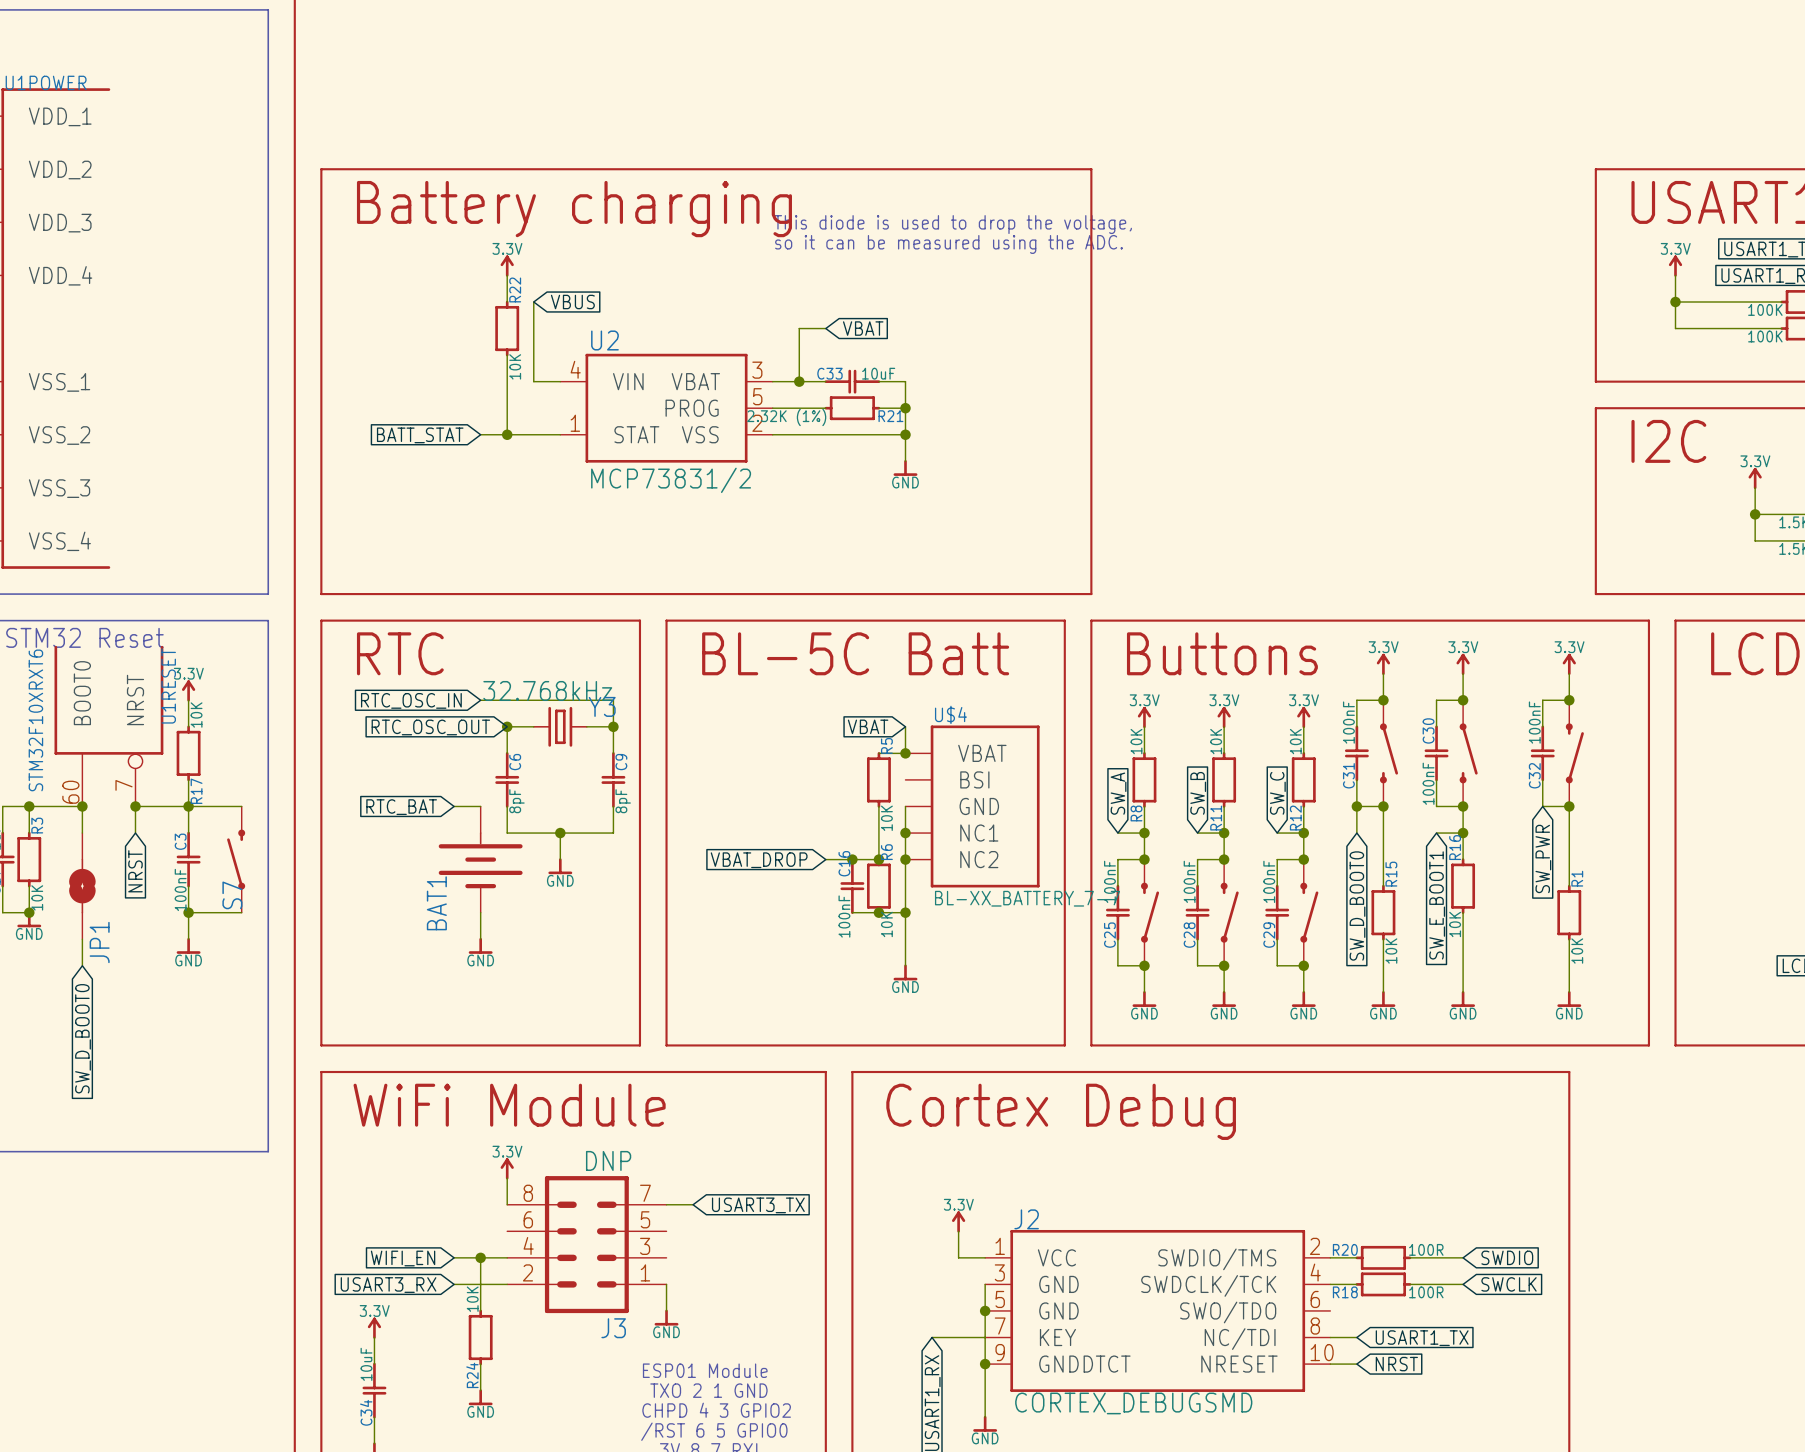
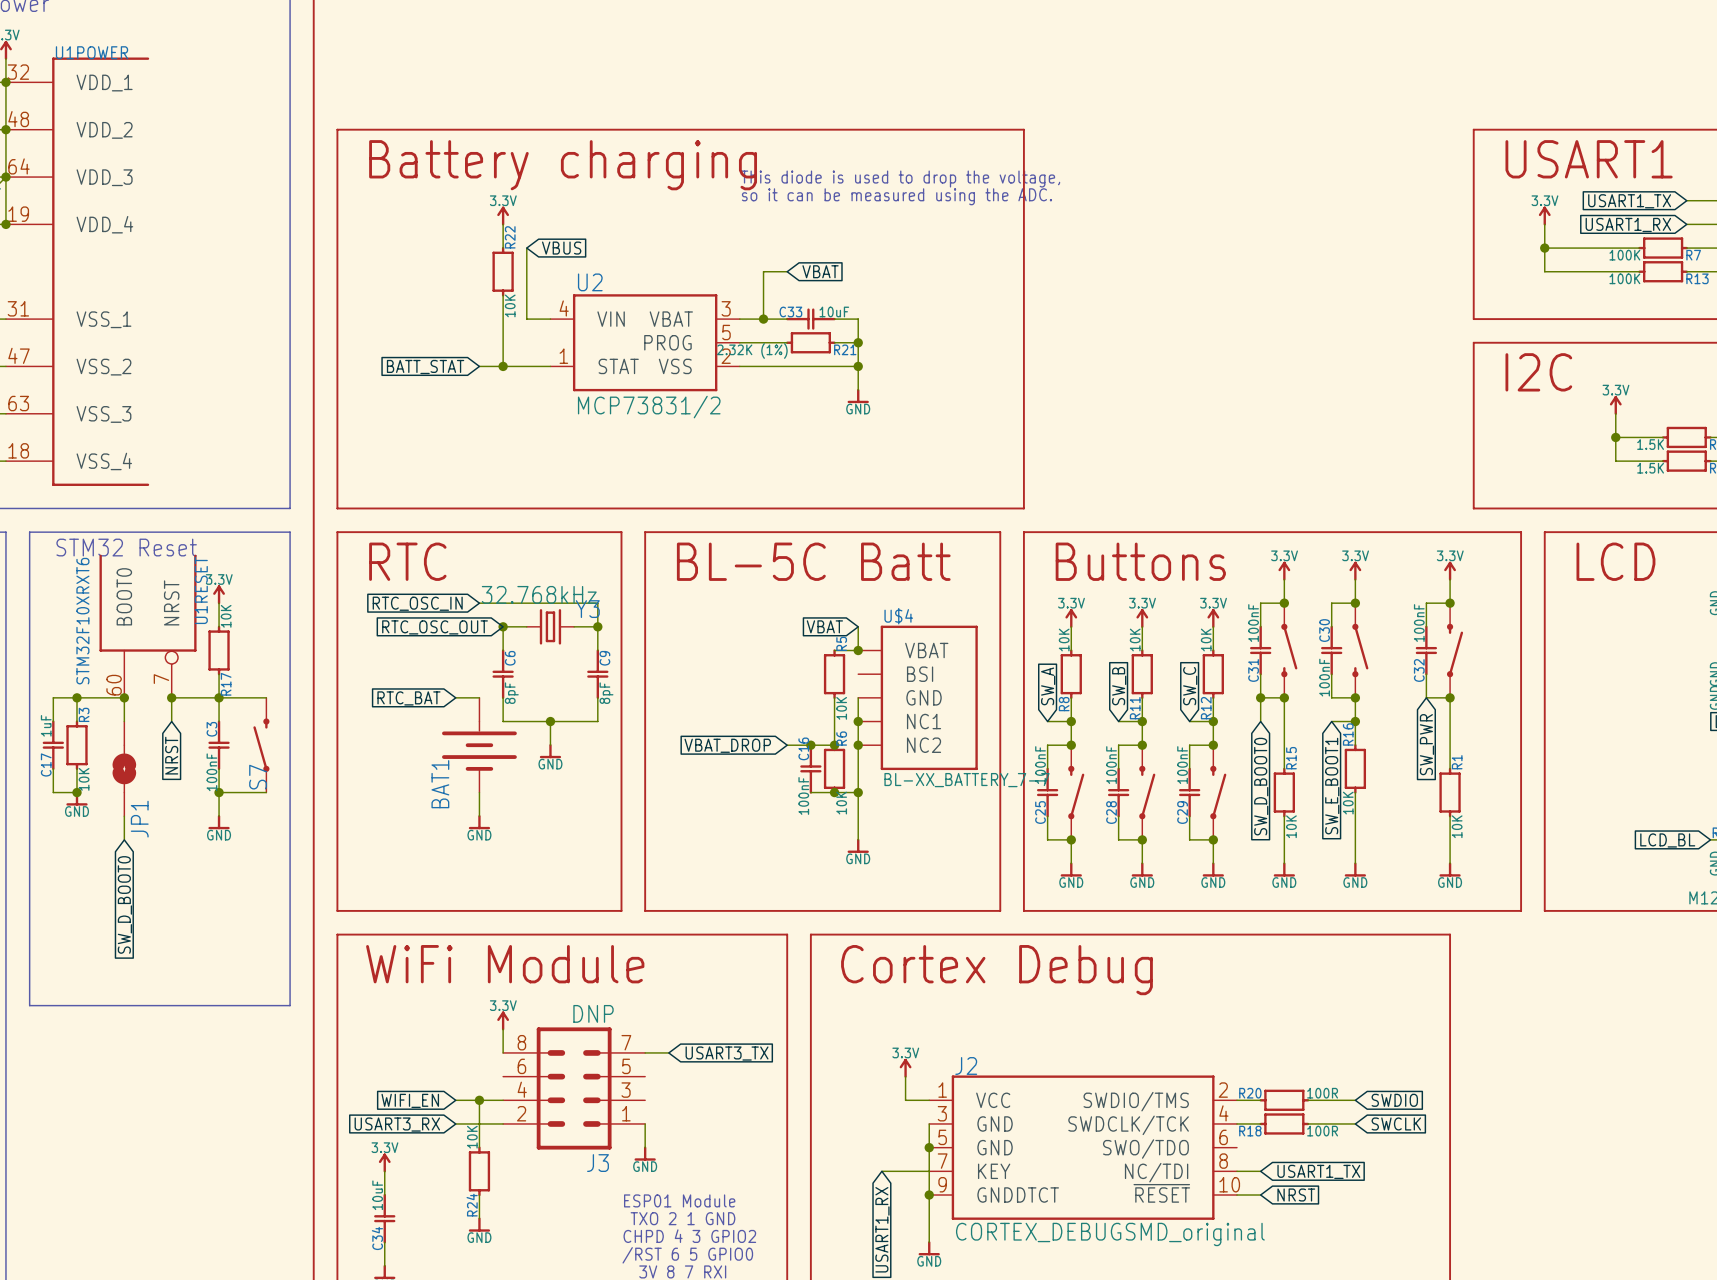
J2 pin name: NRESET (1239, 1364) -> ~{RESET} (1161, 1193)
J2 value: CORTEX_DEBUGSMD (1133, 1403) -> CORTEX_DEBUGSMD_original (1110, 1234)

